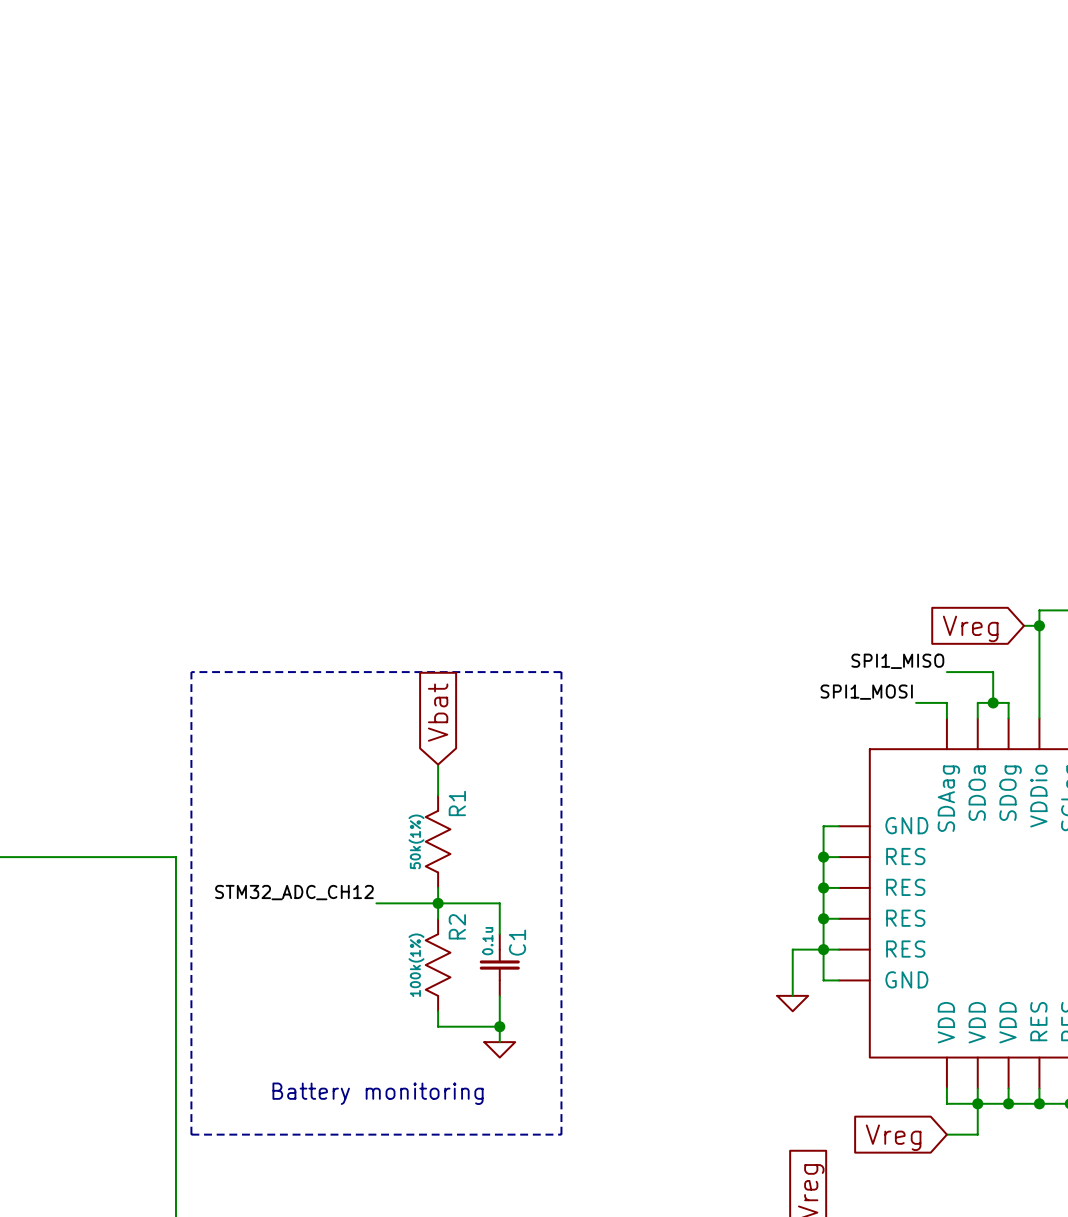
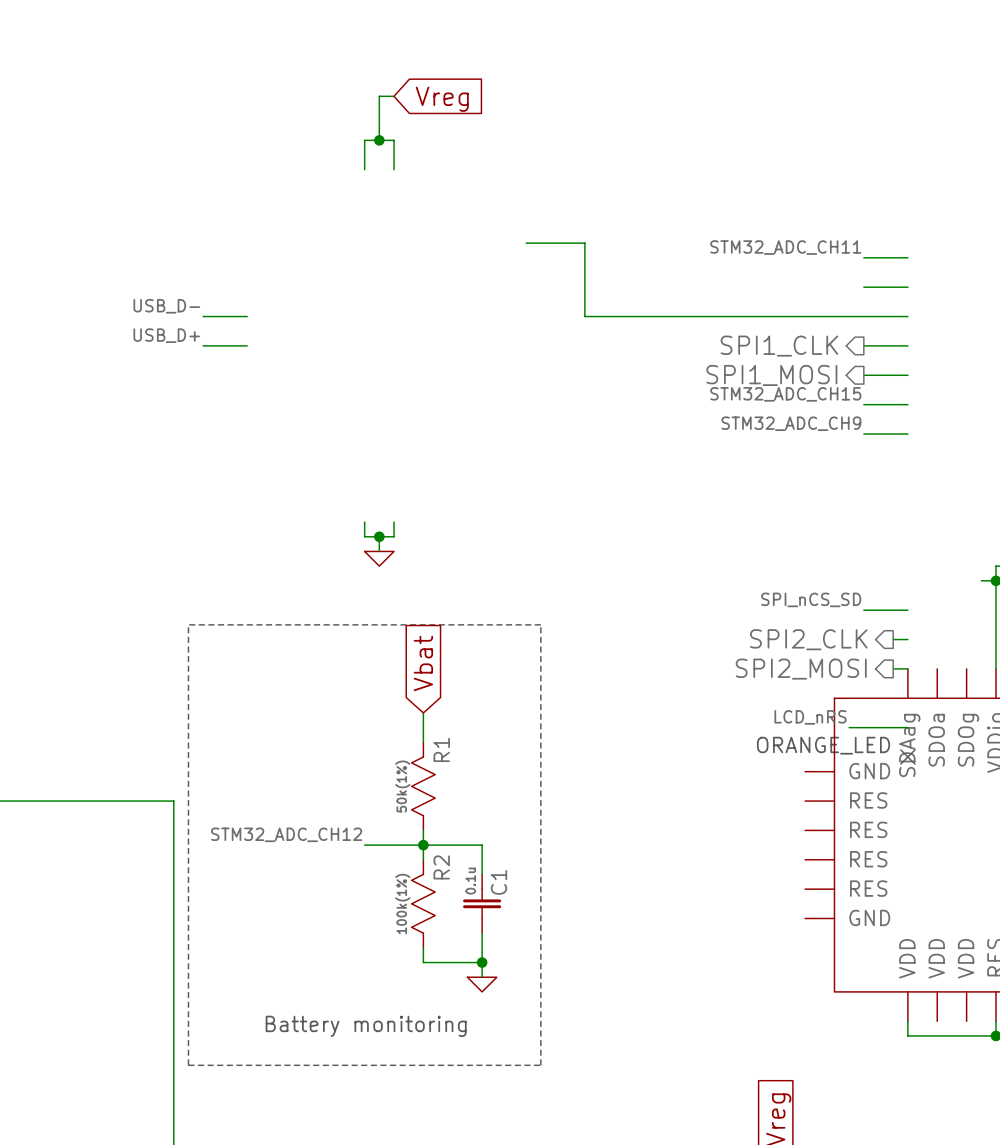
wire: none -> (394, 96) (379, 96) (379, 140)
global label: none -> Vreg (442, 99)
junction: none -> (379, 140)
wire: none -> (364, 169) (364, 140) (394, 140) (394, 169)
wire: none -> (526, 243) (584, 243) (584, 316) (907, 316)
label: none -> STM32_ADC_CH11 (785, 247)
wire: none -> (863, 257) (907, 257)
wire: none -> (863, 287) (907, 287)
label: none -> USB_D- (166, 306)
wire: none -> (203, 316) (247, 316)
label: none -> USB_D+ (166, 335)
wire: none -> (203, 345) (247, 345)
hierarchical label: none -> SPI1_CLK (779, 346)
wire: none -> (863, 345) (907, 345)
wire: none -> (863, 375) (907, 375)
hierarchical label: none -> SPI1_MOSI (771, 375)
label: none -> STM32_ADC_CH15 (785, 394)
wire: none -> (863, 404) (907, 404)
label: none -> STM32_ADC_CH9 (791, 423)
wire: none -> (863, 434) (907, 434)
wire: none -> (364, 522) (364, 536) (394, 536) (394, 522)
wire: none -> (379, 536) (379, 551)
junction: none -> (379, 536)
power symbol: none -> (379, 558)
global label: Vreg (970, 628) -> none
label: none -> SPI_nCS_SD (811, 599)
wire: none -> (863, 610) (907, 610)
label: SPI1_MISO (897, 661) -> none
wire: (946, 672) (993, 672) (993, 702) -> none
hierarchical label: none -> SPI2_CLK (808, 639)
label: SPI1_MOSI (866, 692) -> none
wire: (916, 702) (946, 702) (946, 718) -> (893, 668) (907, 668)
junction: (993, 702) -> none
hierarchical label: none -> SPI2_MOSI (801, 669)
wire: (977, 718) (977, 702) (1008, 702) (1008, 718) -> none
label: none -> LCD_nRS (810, 717)
wire: none -> (849, 727) (907, 727)
text: none -> ORANGE_LED (823, 745)
no-connect mark: none -> (907, 757)
wire: (838, 826) (823, 826) (823, 980) (838, 980) -> none
wire: (823, 857) (838, 857) -> (893, 639) (907, 639)
junction: (823, 857) -> none
wire: (823, 887) (838, 887) -> none
junction: (823, 887) -> none
wire: (823, 918) (838, 918) -> none
junction: (823, 918) -> none
junction: (823, 949) -> none
wire: (838, 949) (792, 949) (792, 995) -> none
power symbol: (792, 1003) -> none
wire: (977, 1088) (977, 1134) (946, 1134) -> none
wire: (1008, 1088) (1008, 1103) -> none
junction: (977, 1103) -> none
junction: (1008, 1103) -> none
global label: Vreg (893, 1137) -> none

